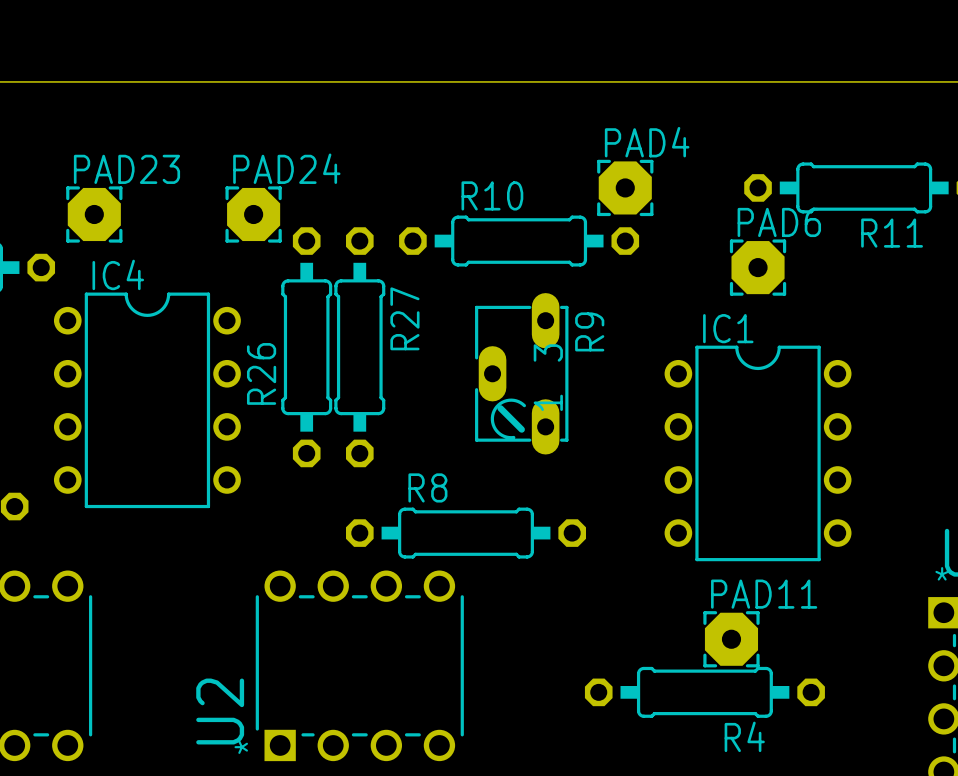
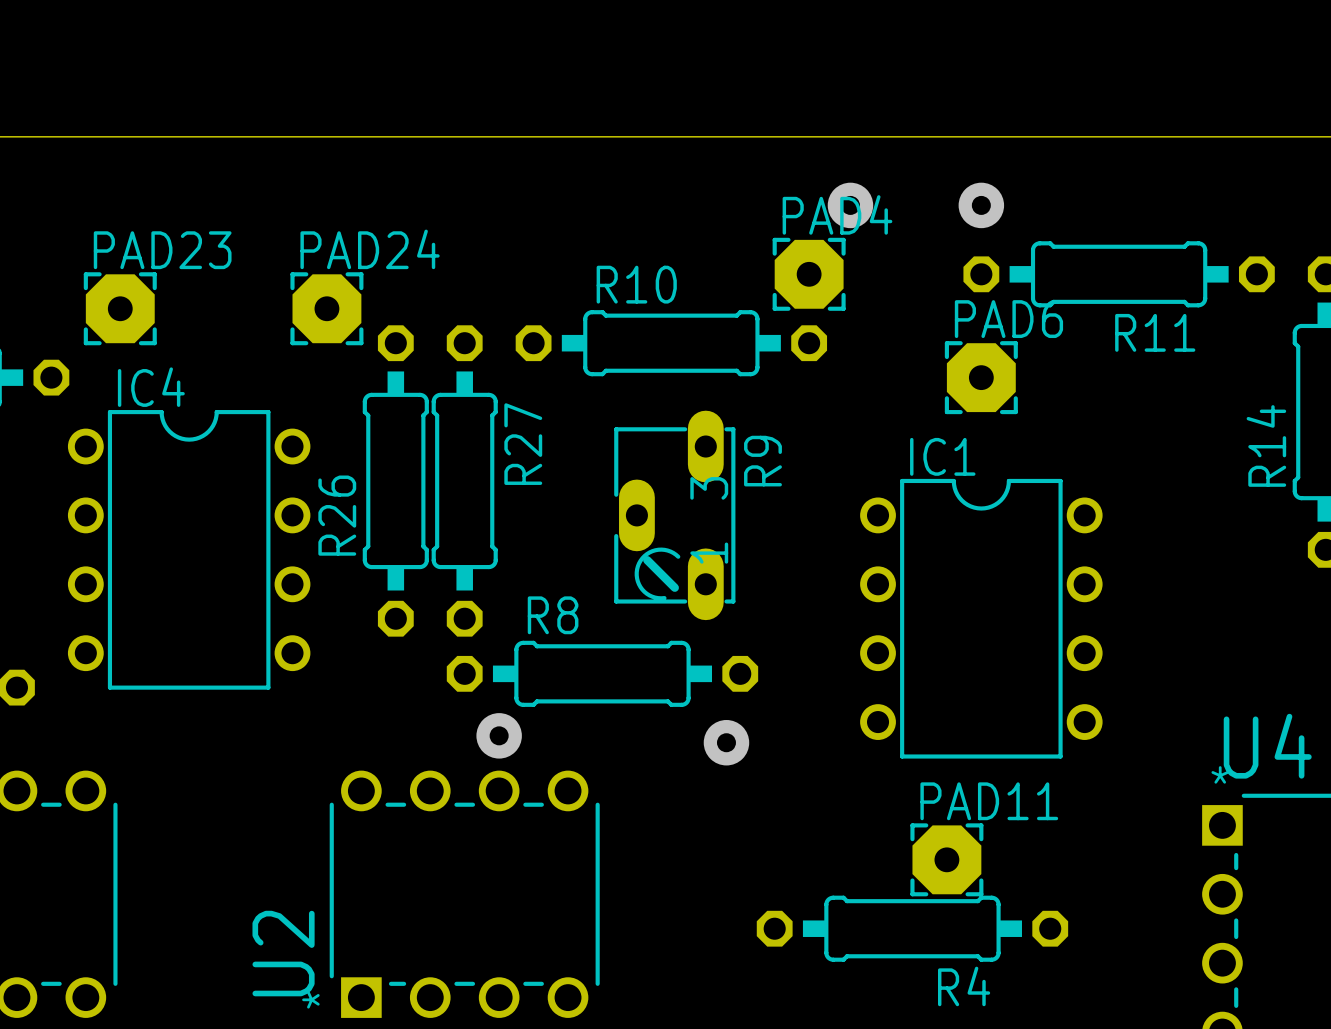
via: none -> (850, 205)
via: none -> (981, 205)
R8 position: (466, 533) -> (602, 673)
via: none -> (499, 735)
via: none -> (726, 742)

